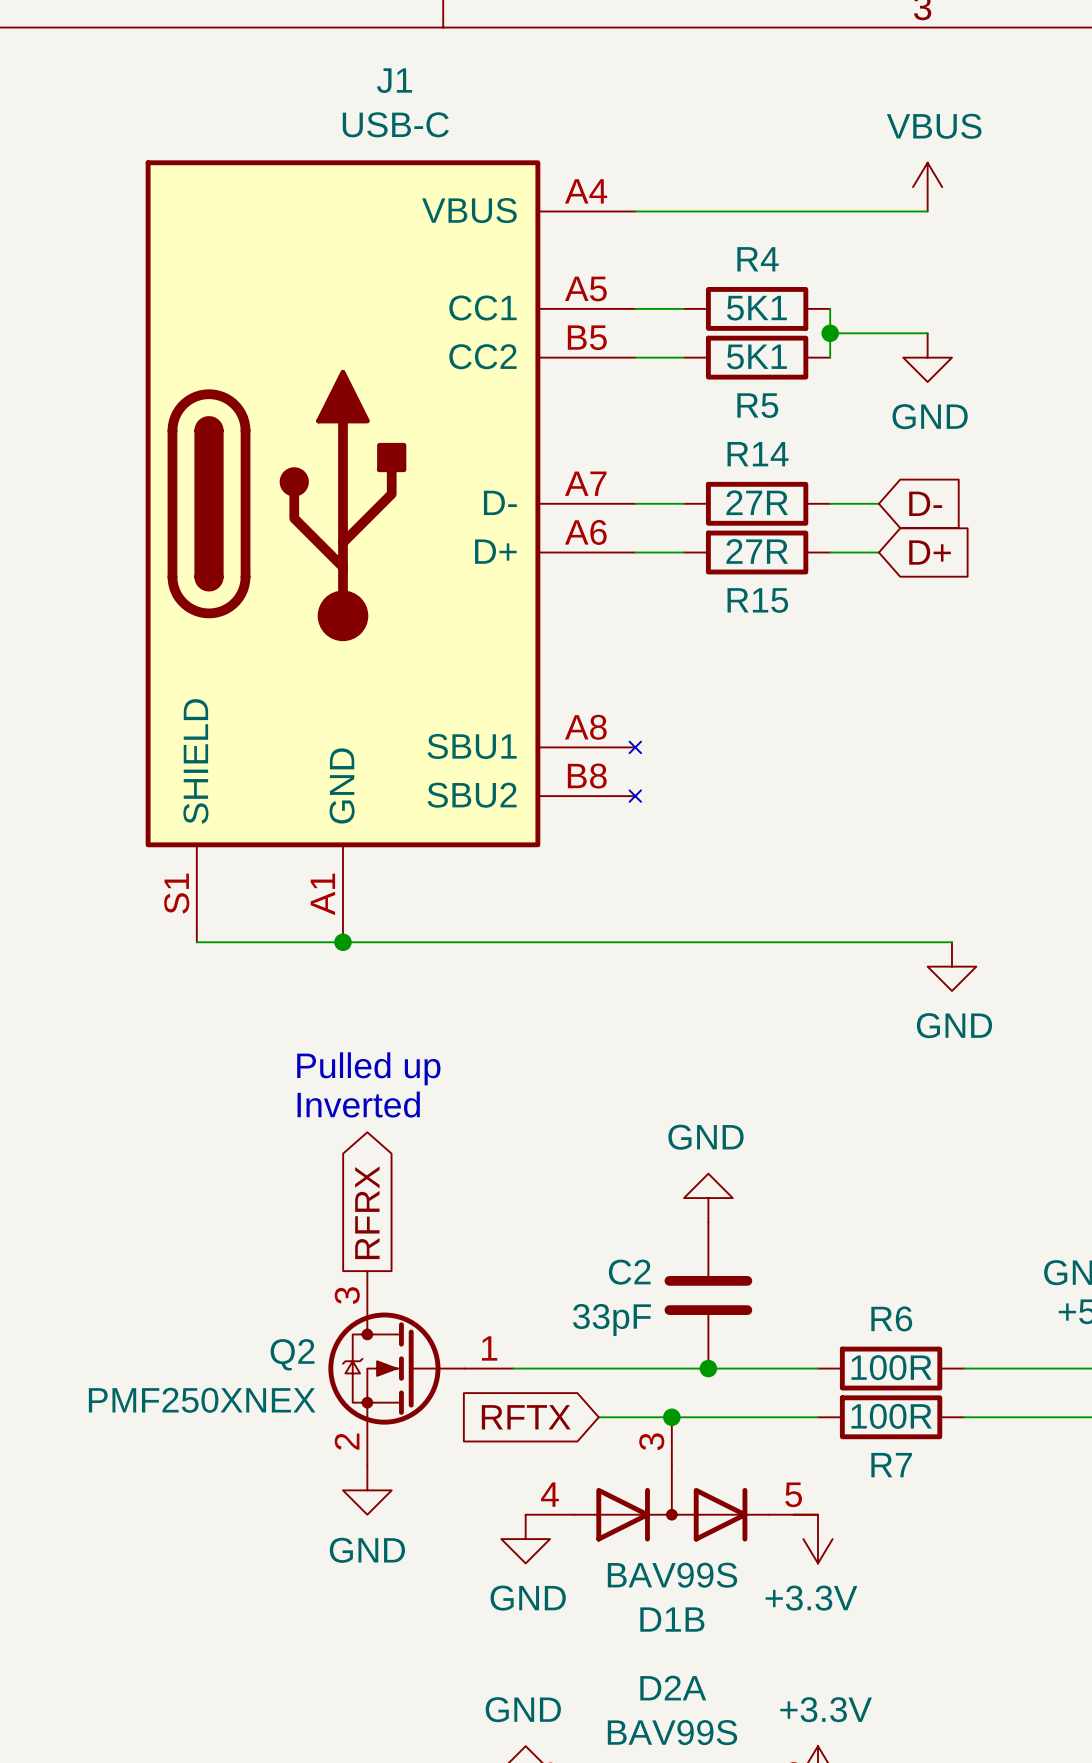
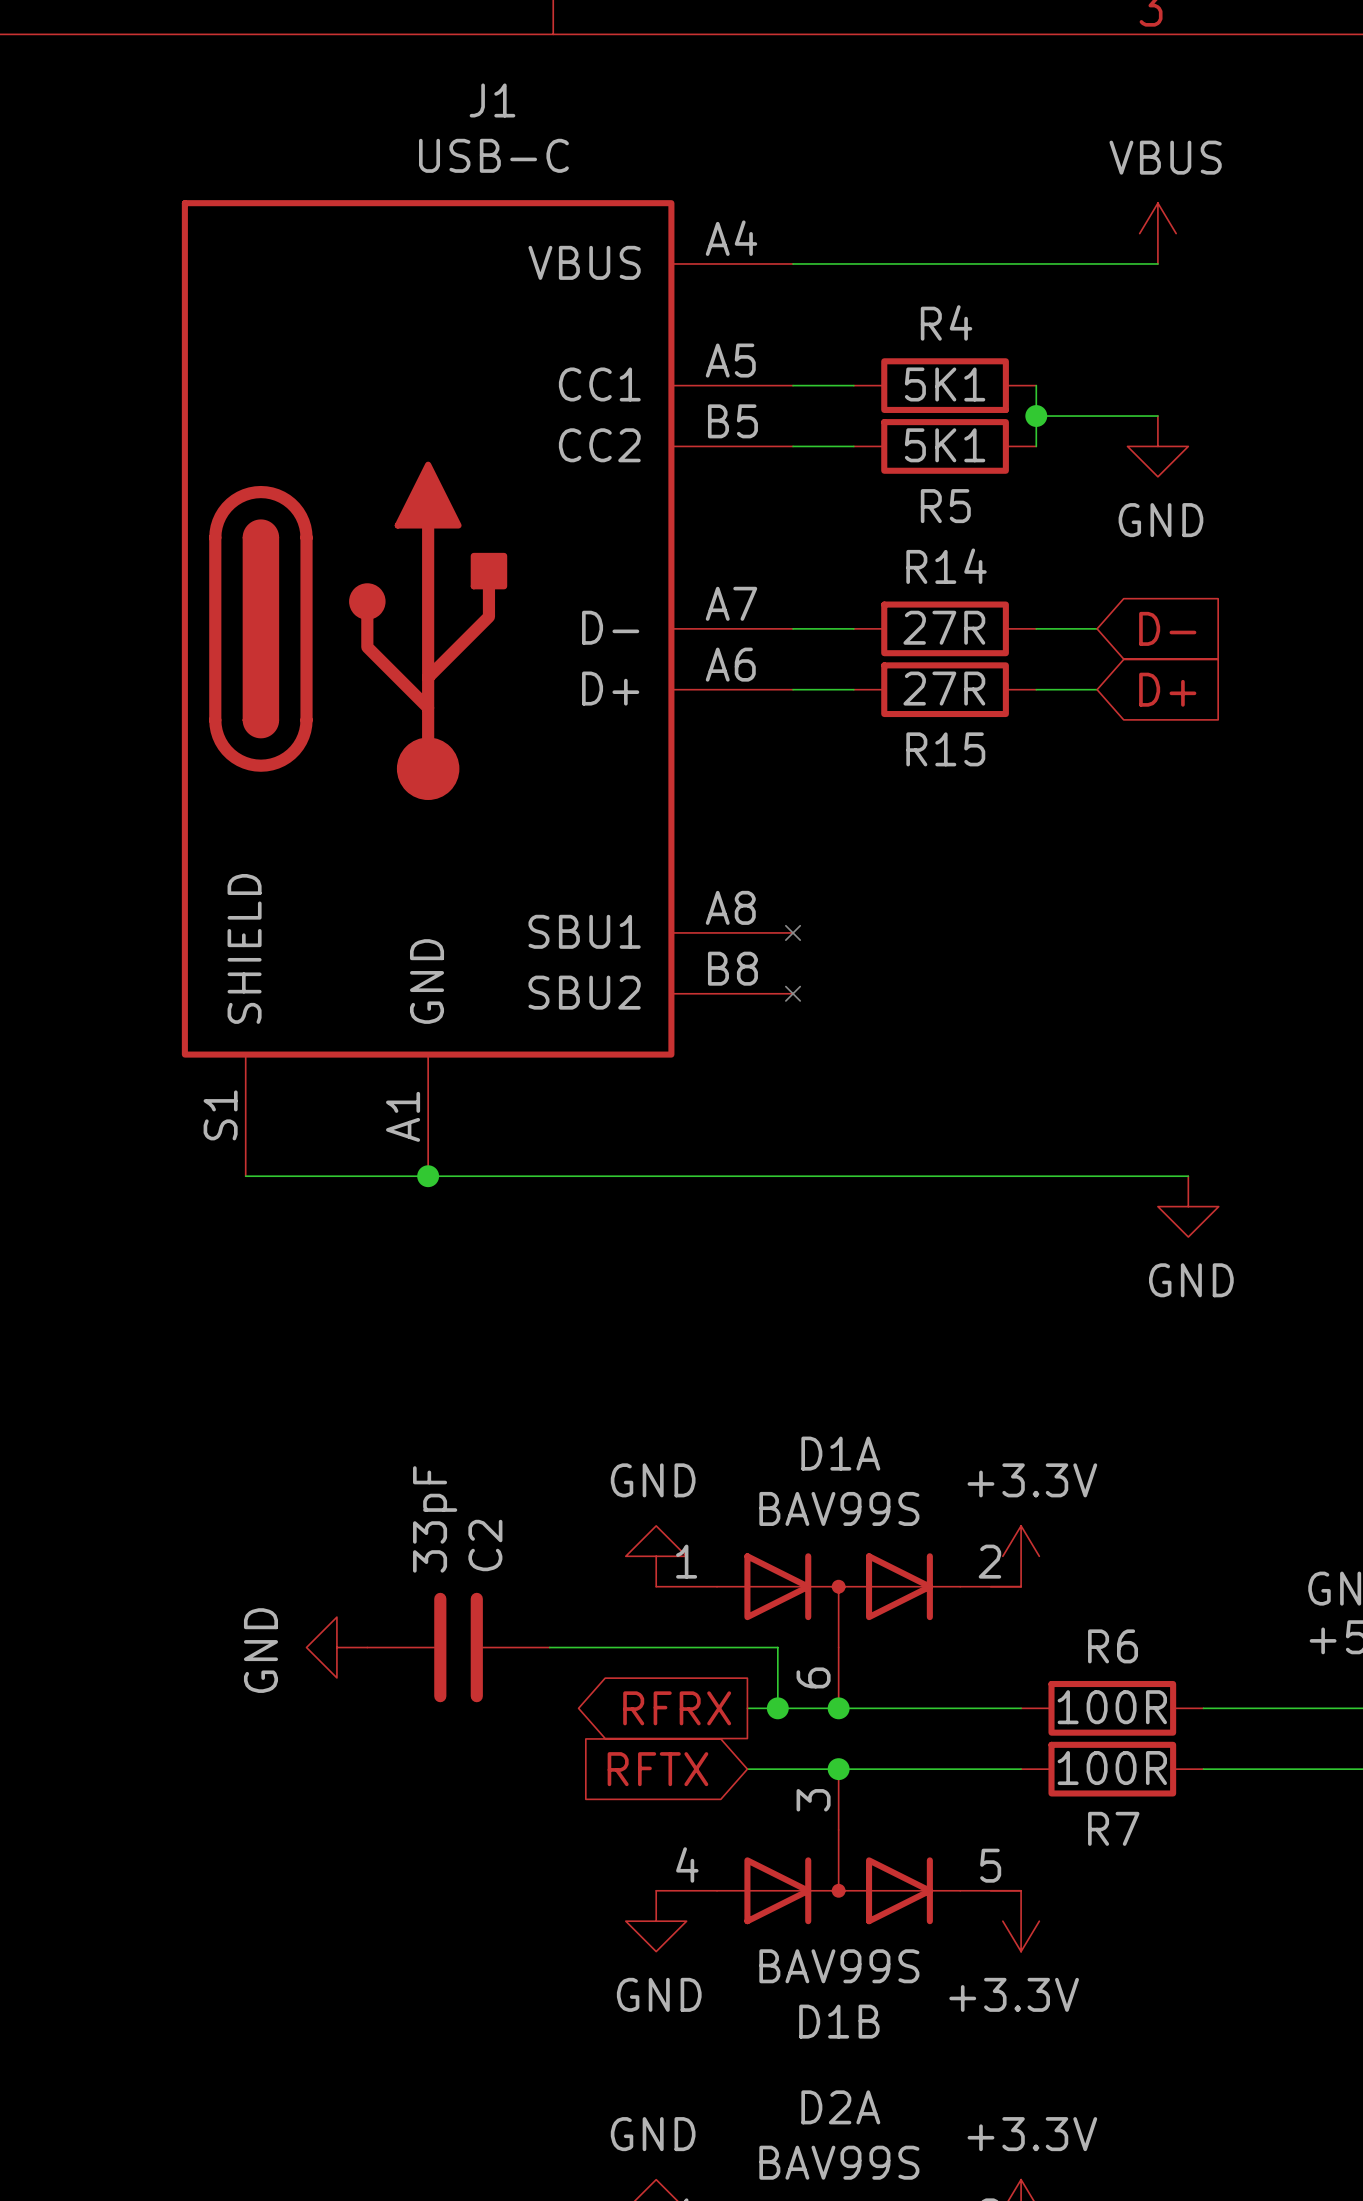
text: Pulled up (368, 1068) -> none
text: Inverted (358, 1104) -> none
power symbol: GND (708, 1198) -> none
global label rotation: 0° (367, 1212) -> 90° counterclockwise (677, 1708)
global label position: RFRX (367, 1212) -> RFRX (677, 1708)
power symbol: none -> GND (656, 1556)
power symbol: none -> +3.3V (1021, 1556)
C2 rotation: 0° (708, 1295) -> 90° clockwise (458, 1647)
C2 position: (708, 1295) -> (458, 1647)
D1A: none -> BAV99S (838, 1630)
power symbol: none -> GND (336, 1647)
wire: none -> (549, 1647) (777, 1647) (777, 1708)
Q2: PMF250XNEX (420, 1368) -> none
wire: (513, 1368) (598, 1368) -> none
junction: none -> (777, 1708)
junction position: (708, 1368) -> (838, 1708)
power symbol: GND (367, 1490) -> none

